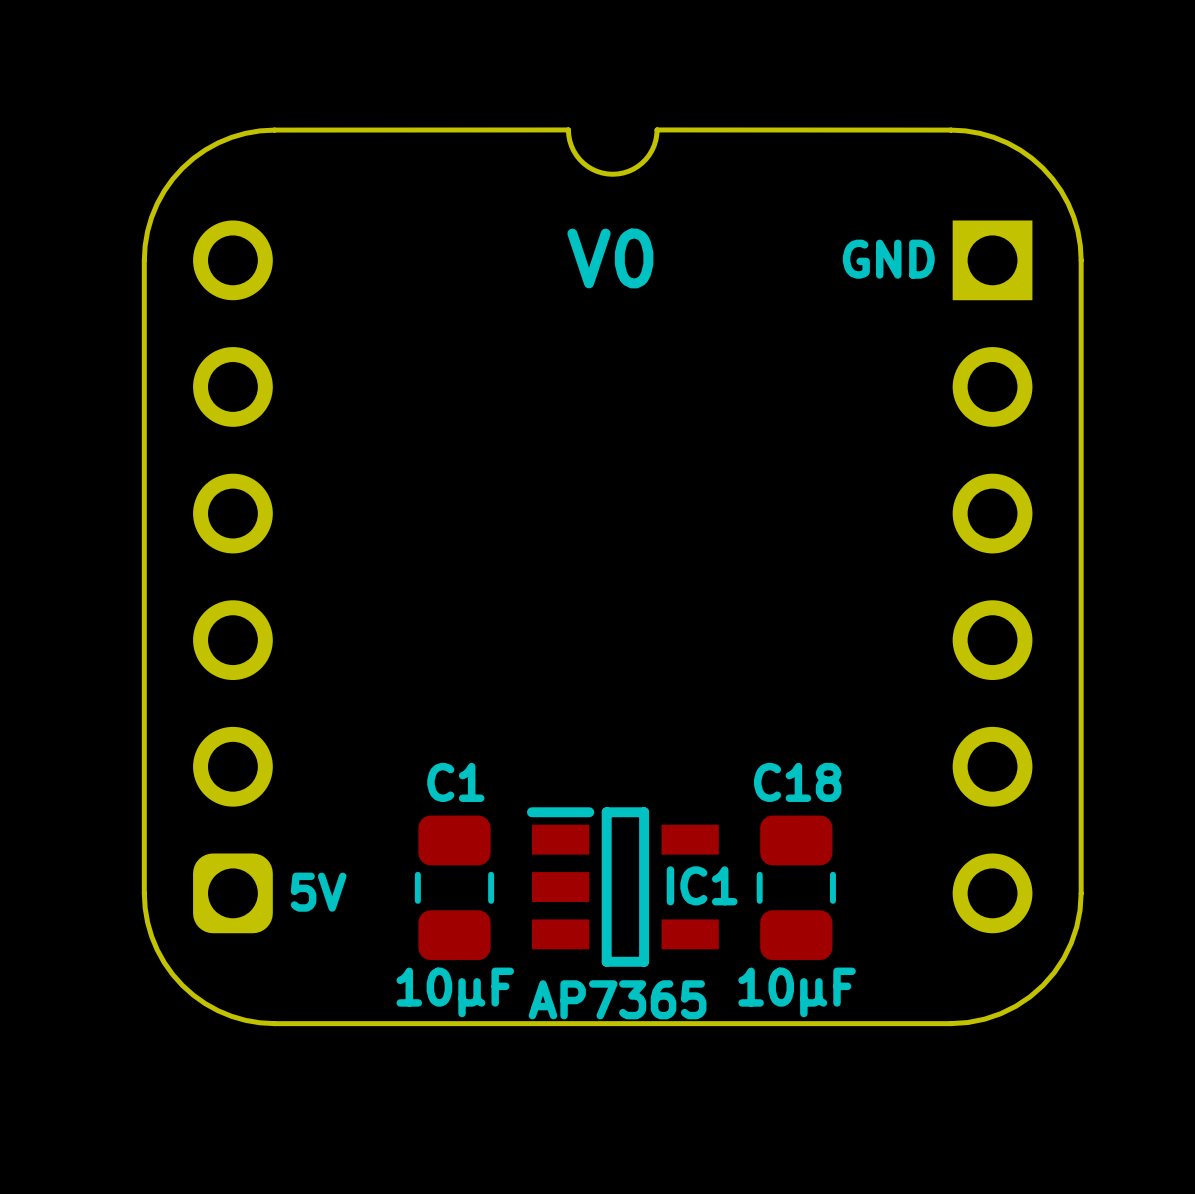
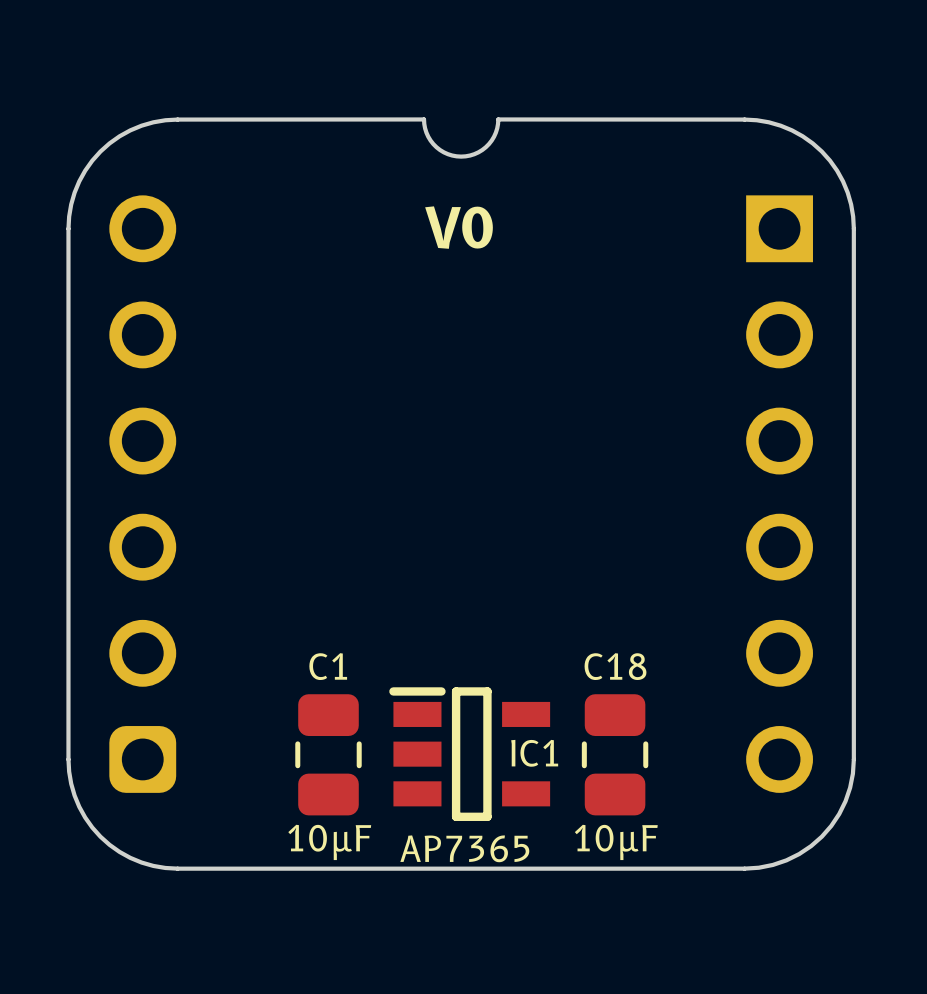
text: GND (888, 259) -> none
text: 5V (318, 892) -> none

